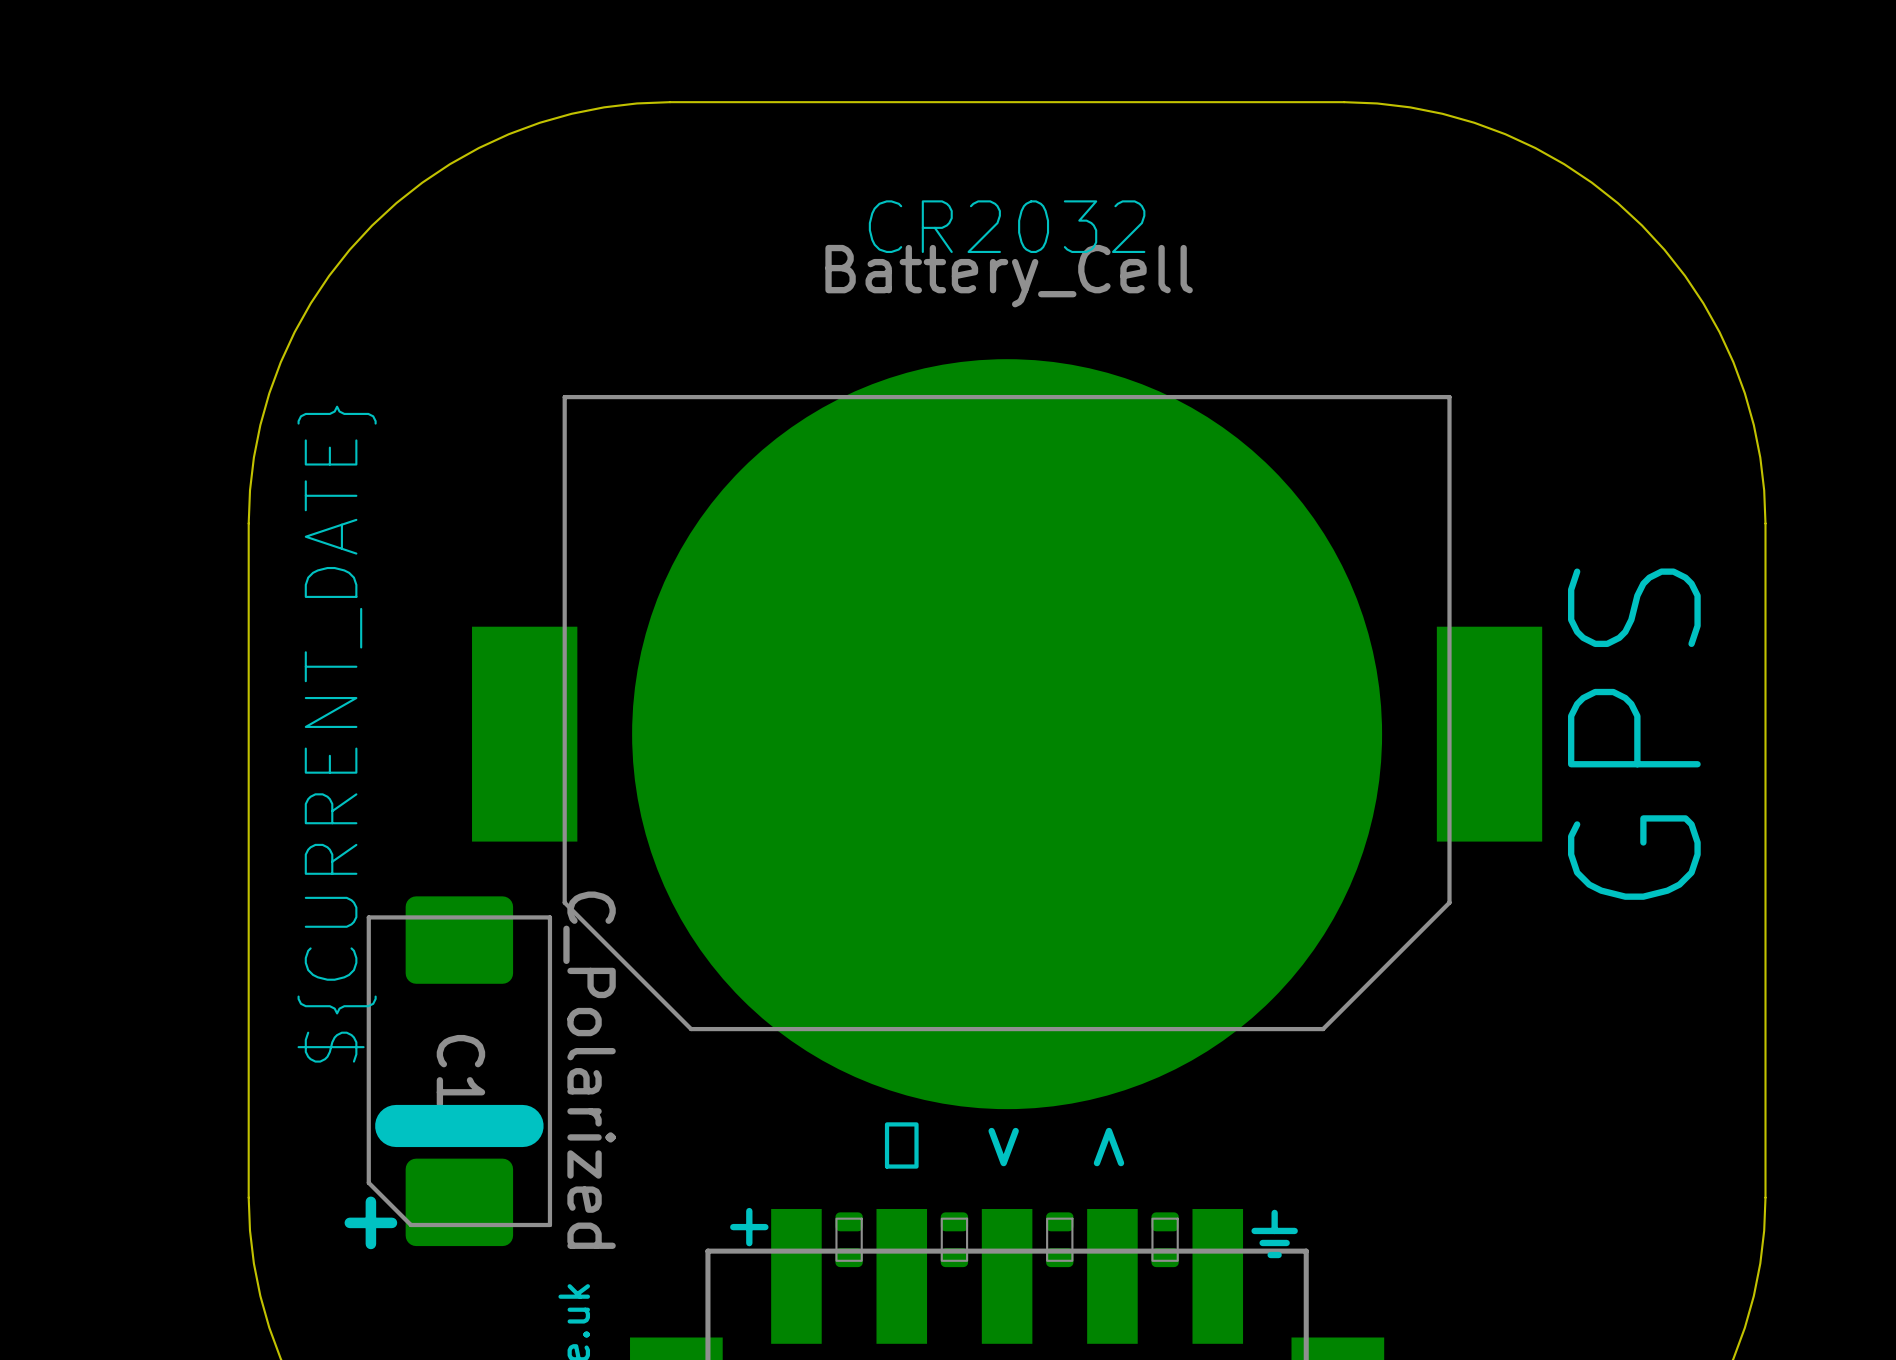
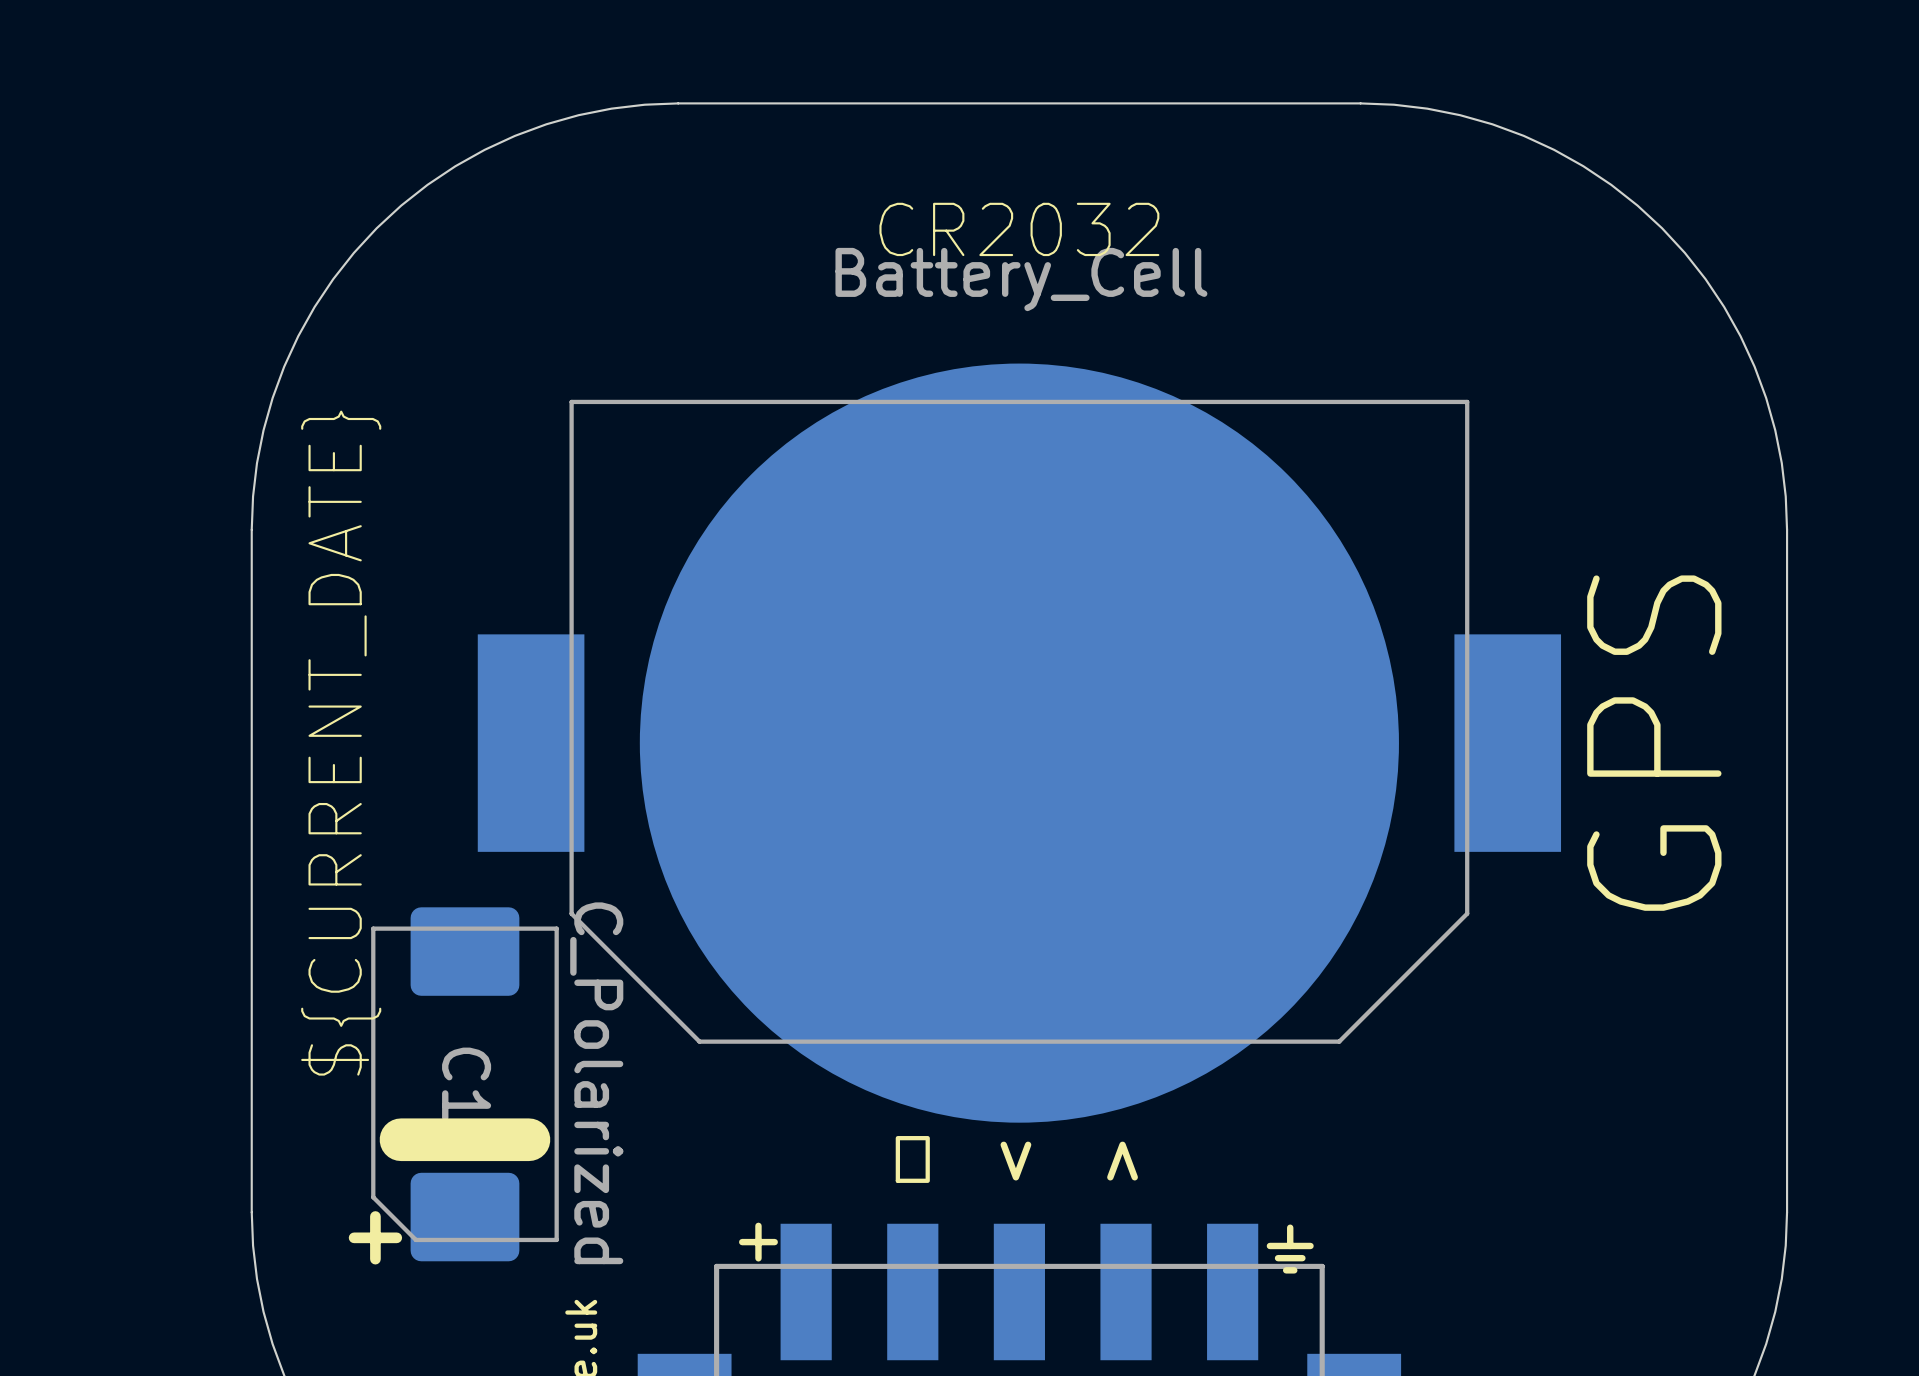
part: (849, 1239) -> none
part: (954, 1239) -> none
part: (1059, 1239) -> none
part: (1165, 1239) -> none

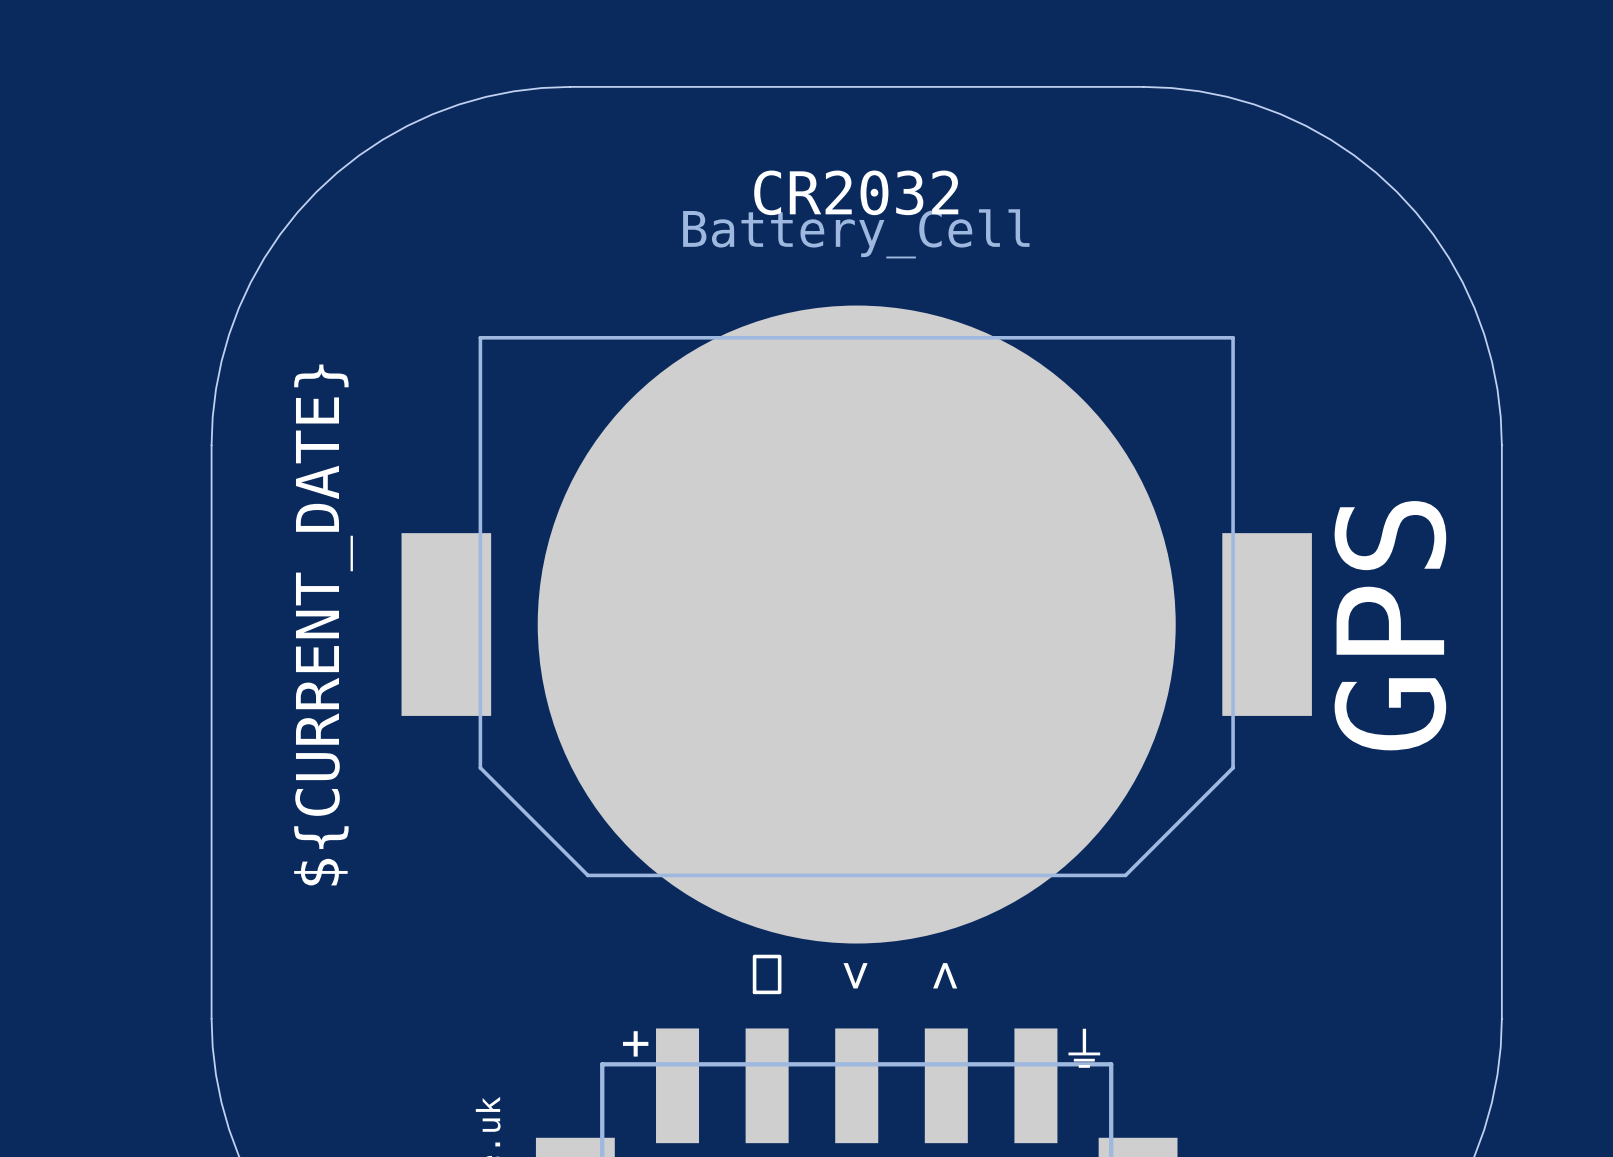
text position: ${CURRENT_DATE} (341, 743) -> ${CURRENT_DATE} (323, 624)
C1: C_Polarized (453, 1085) -> none

